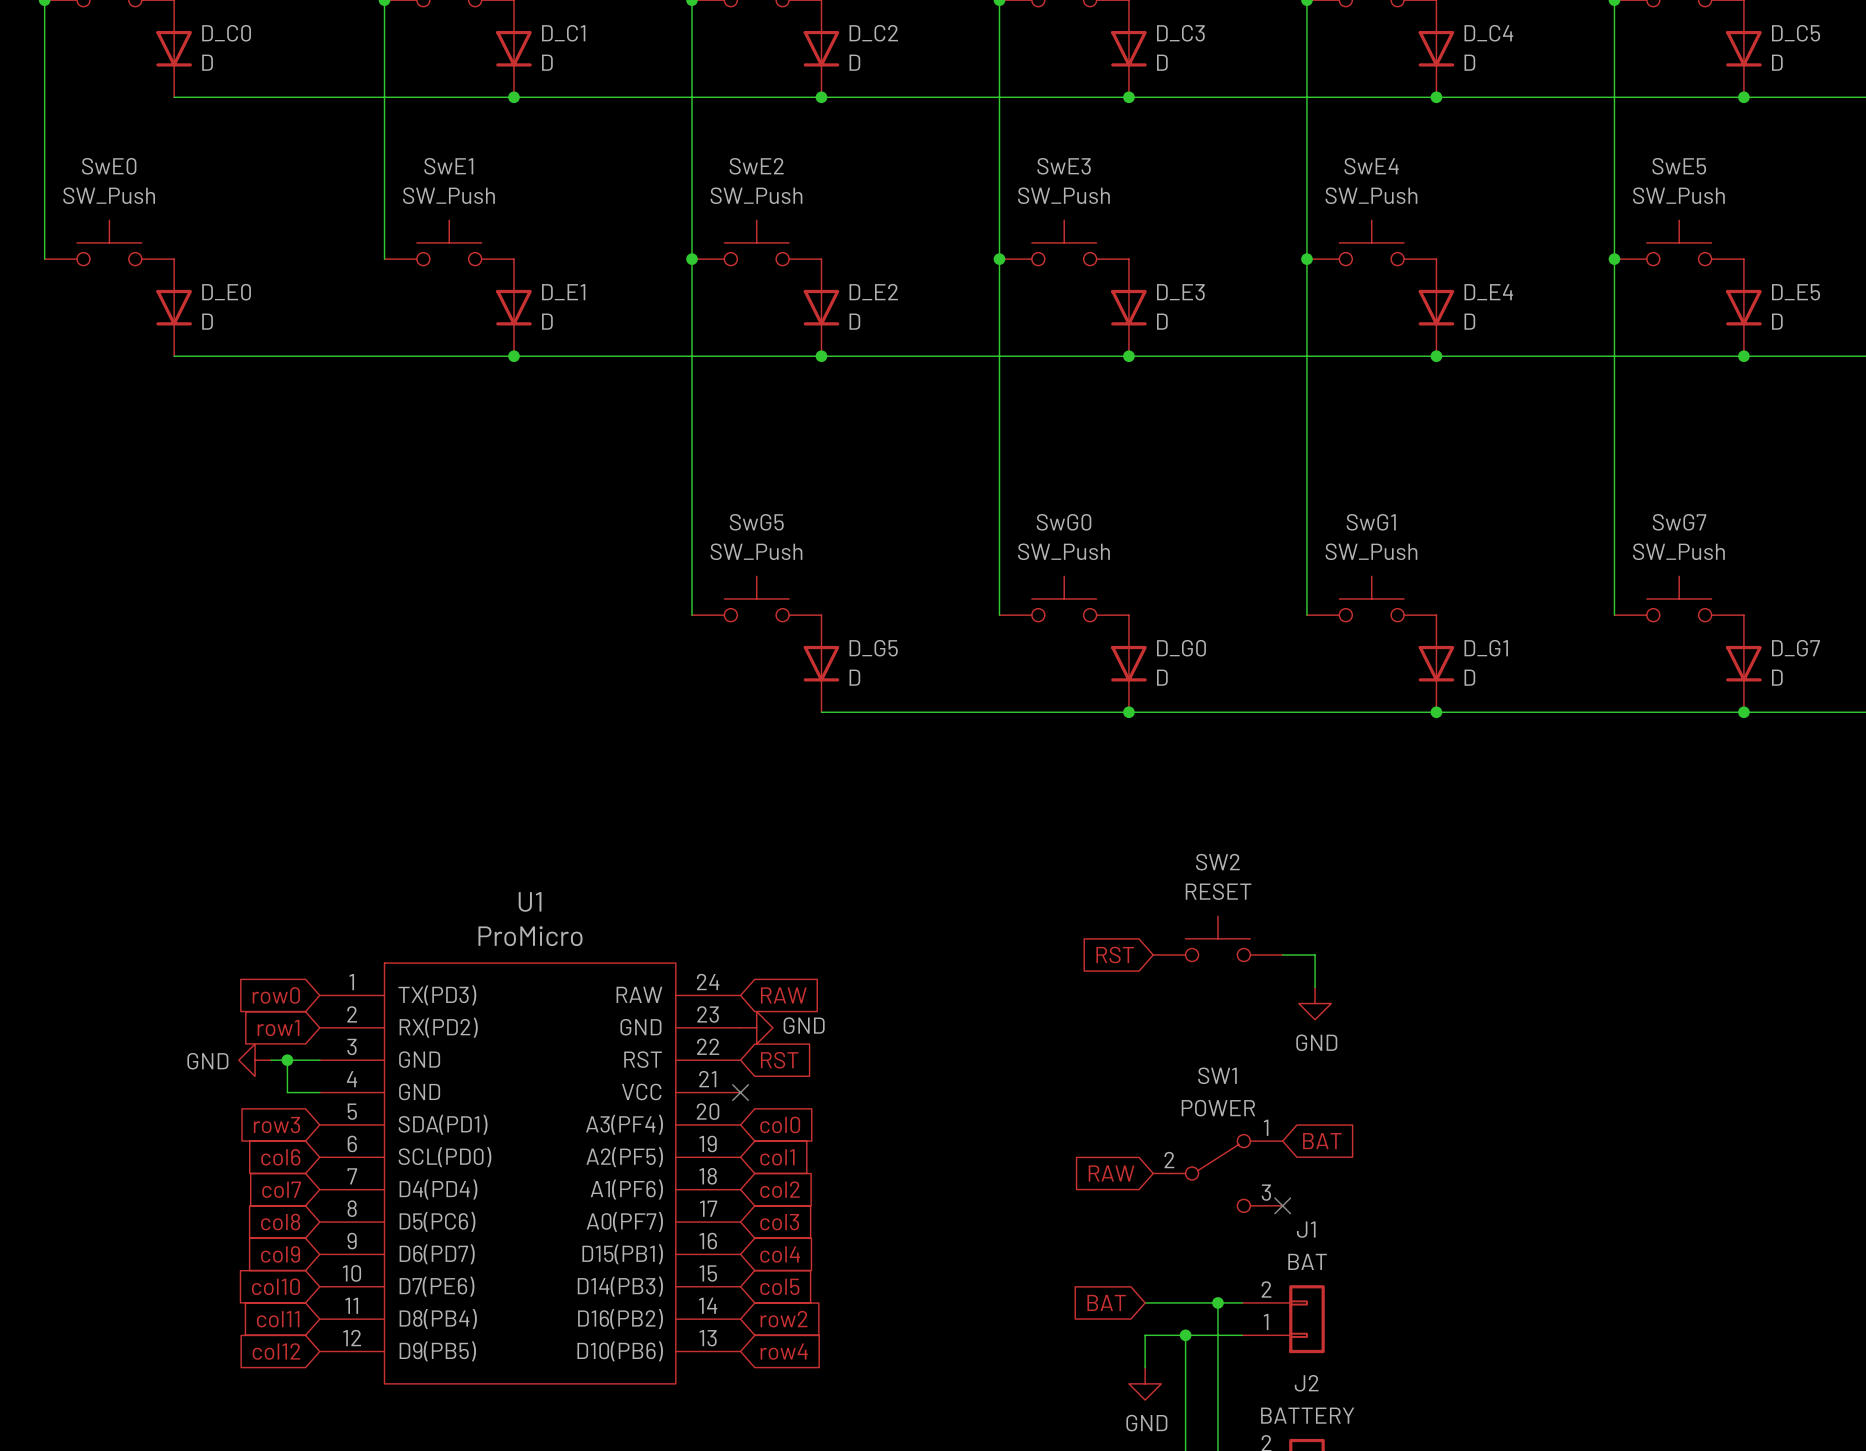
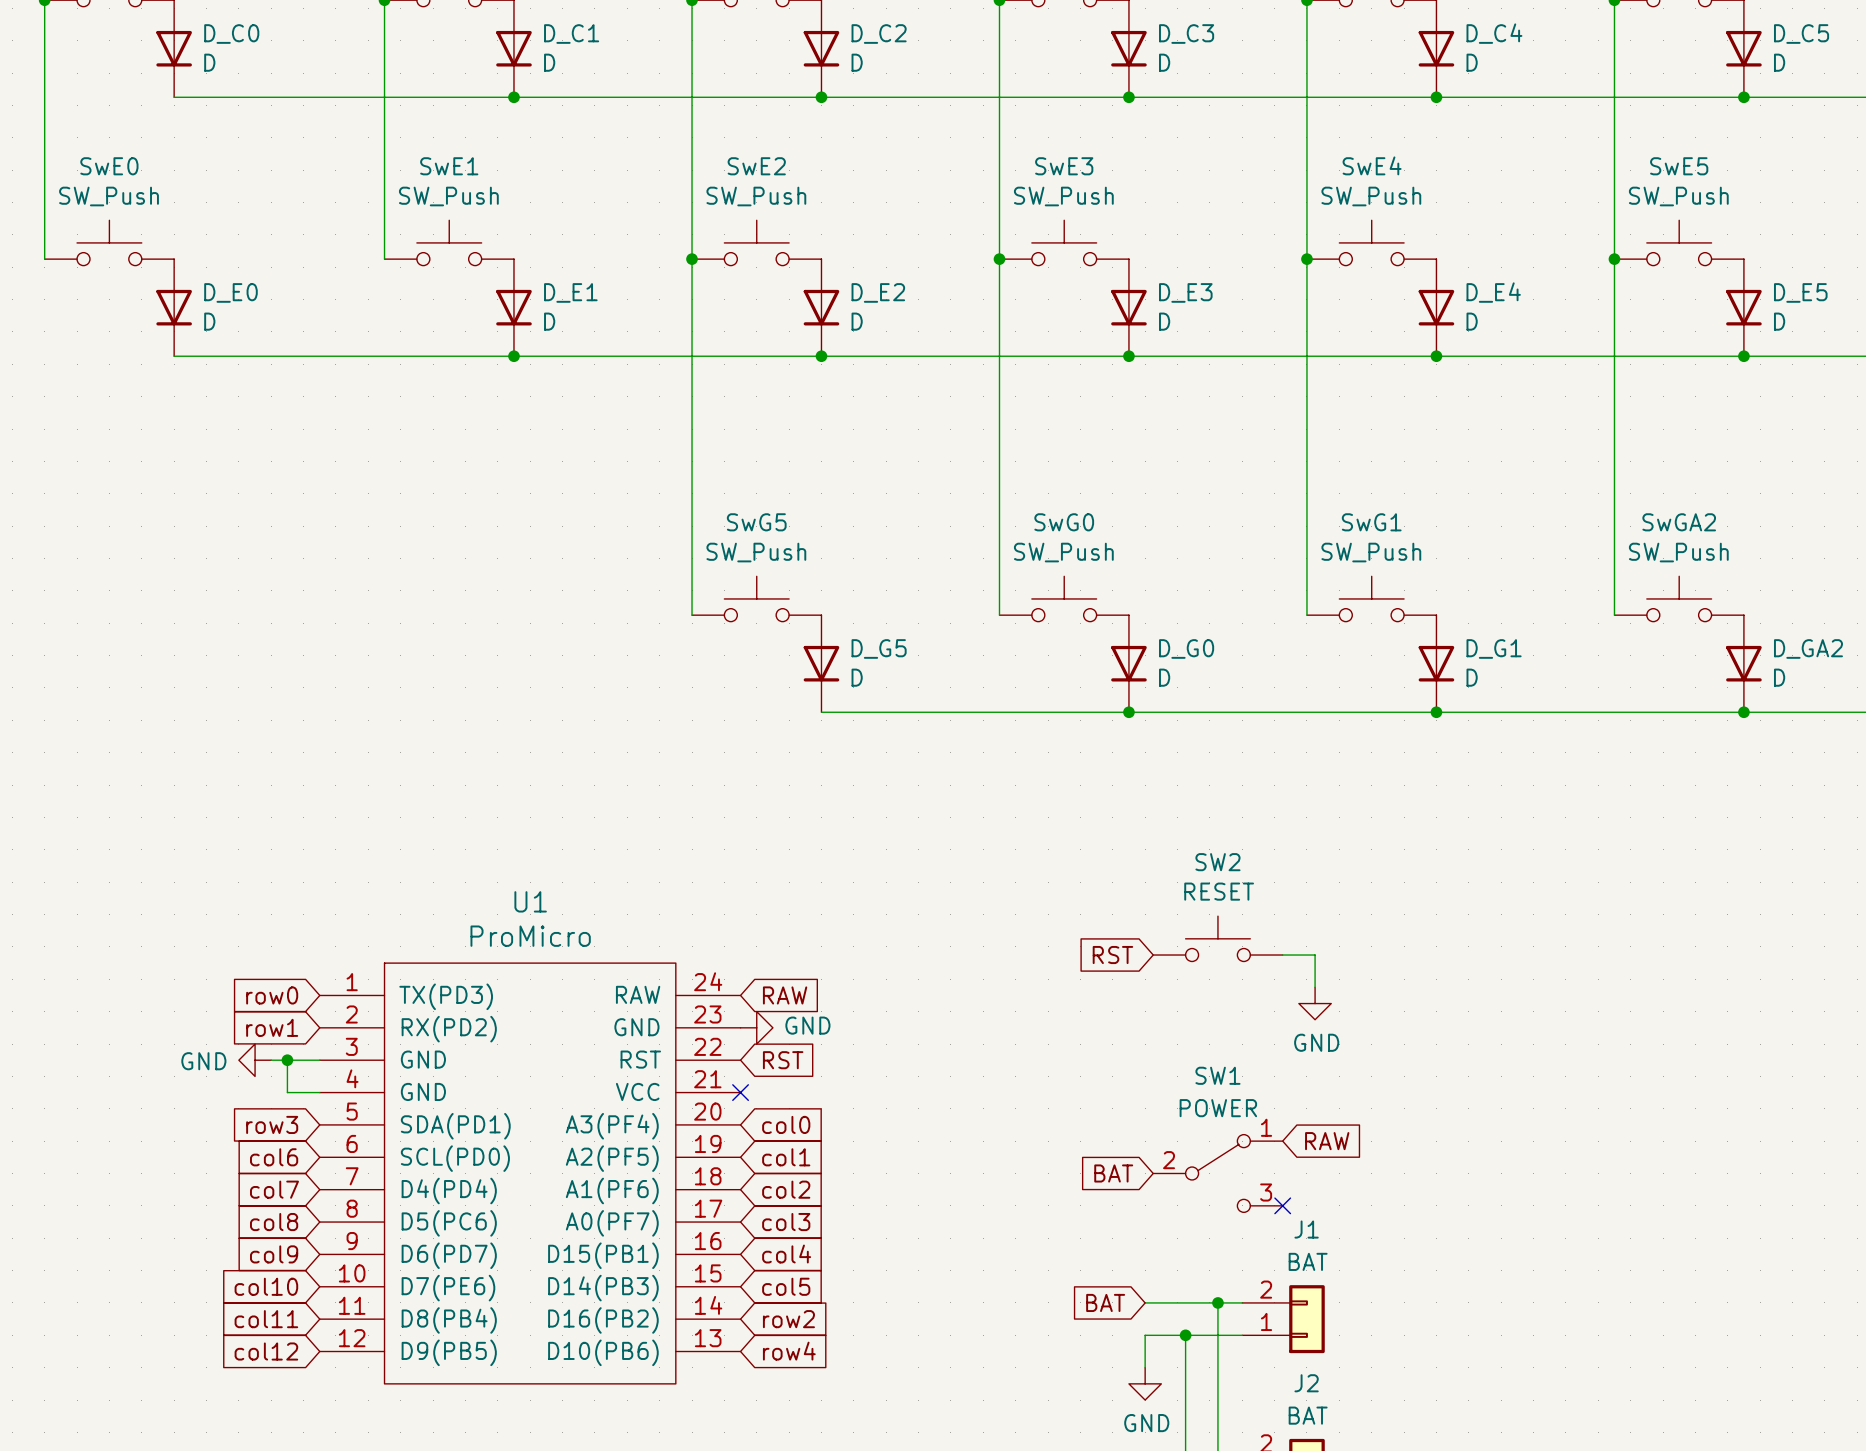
SwG7 name: SwG7 (1679, 522) -> SwGA2 (1679, 522)
D_G7 name: D_G7 (1795, 648) -> D_GA2 (1808, 648)
global label: BAT (1322, 1141) -> RAW (1327, 1141)
global label: RAW (1111, 1173) -> BAT (1113, 1173)
J2 value: BATTERY (1307, 1415) -> BAT (1308, 1415)

